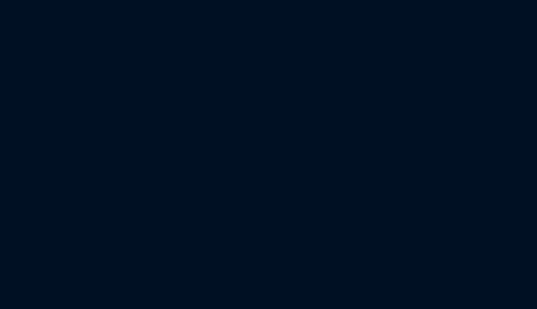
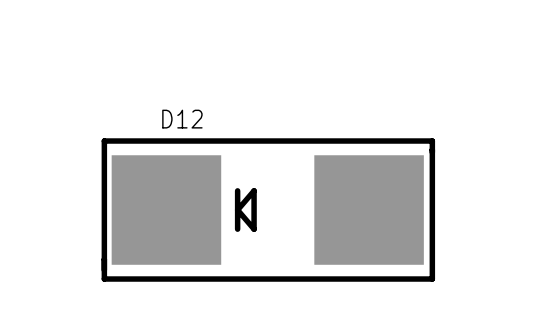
D12: none -> (268, 210)

